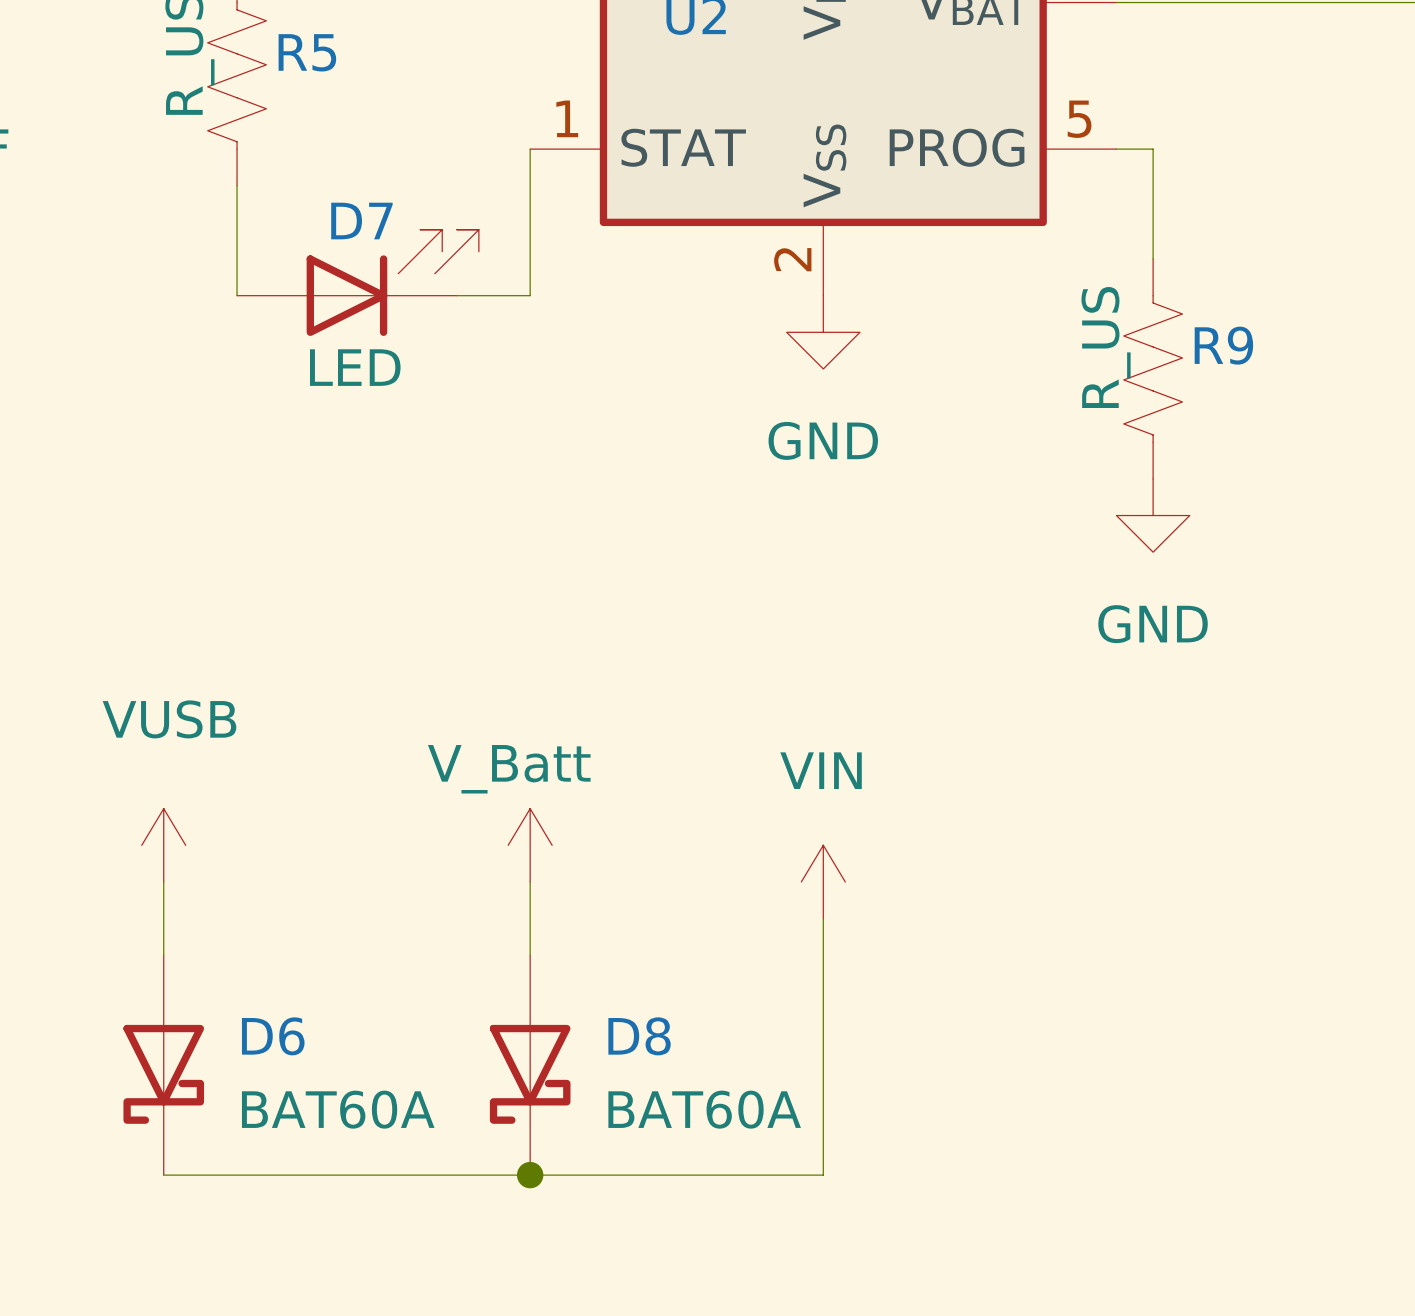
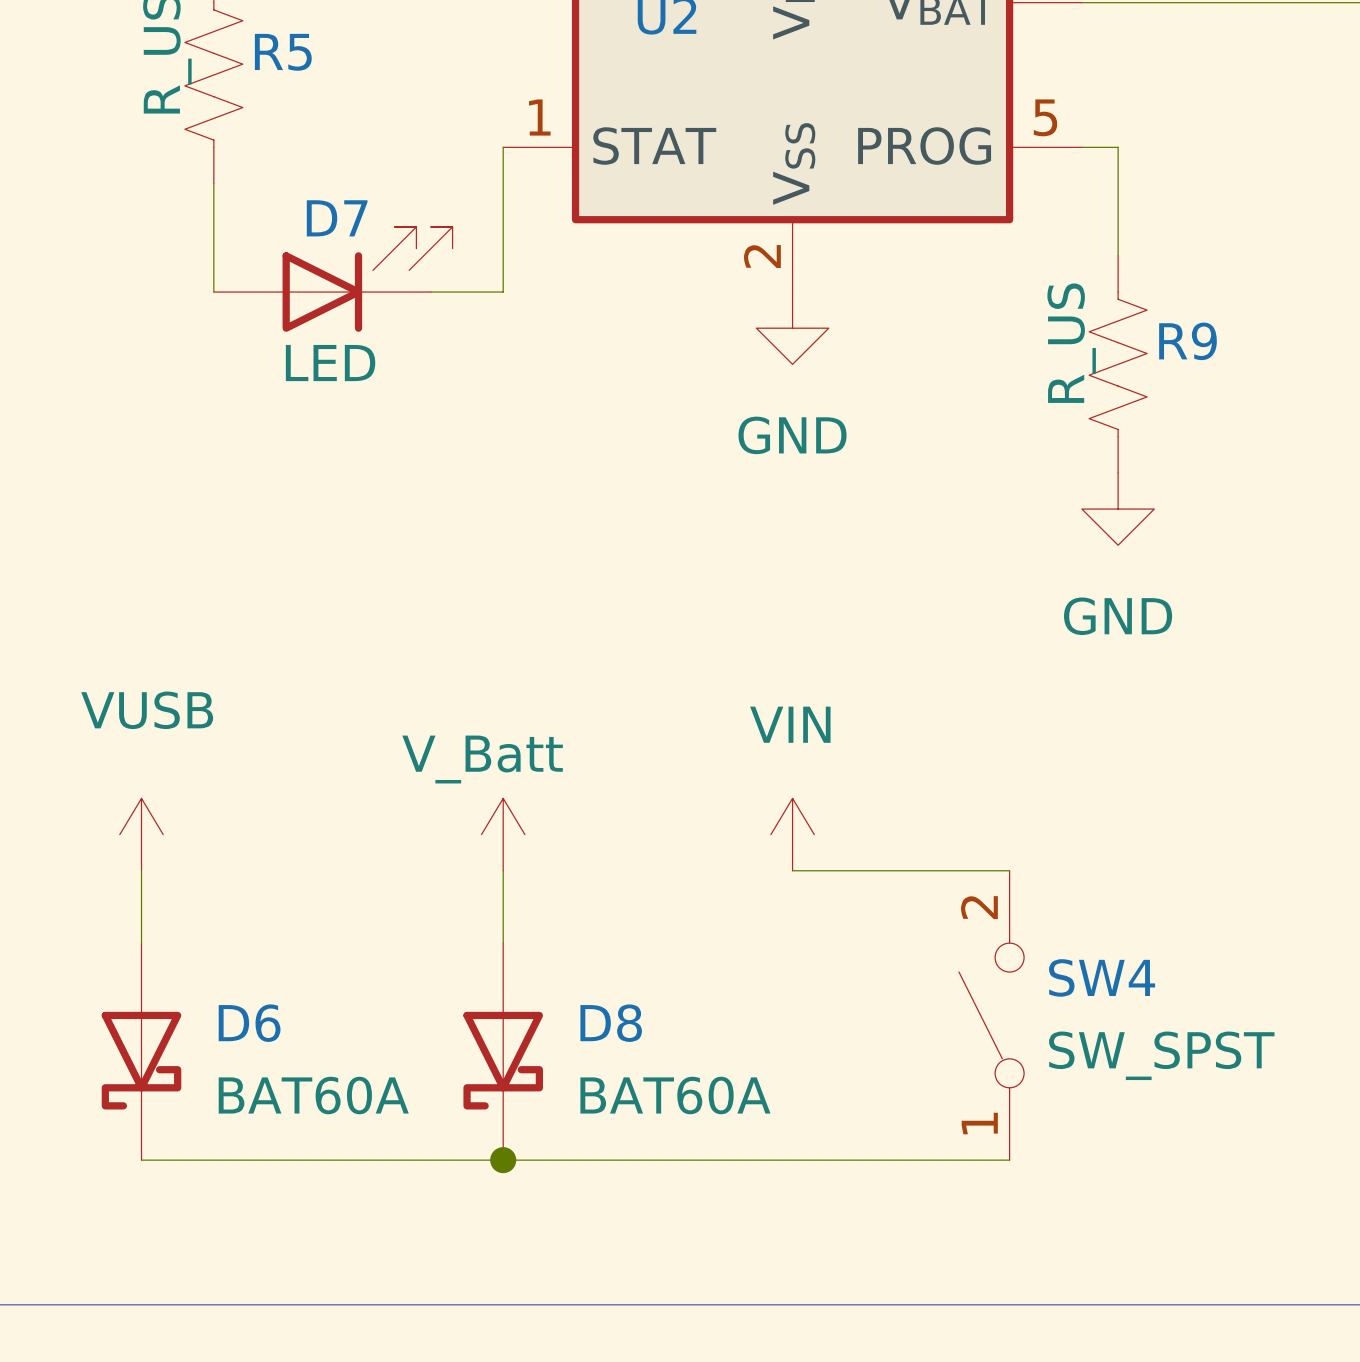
wire: none -> (792, 870) (1009, 870)
power symbol position: VIN (823, 881) -> VIN (792, 834)
wire: (823, 918) (823, 1175) -> (1009, 1160) (792, 1160)
SW4: none -> SW_SPST (991, 1015)

